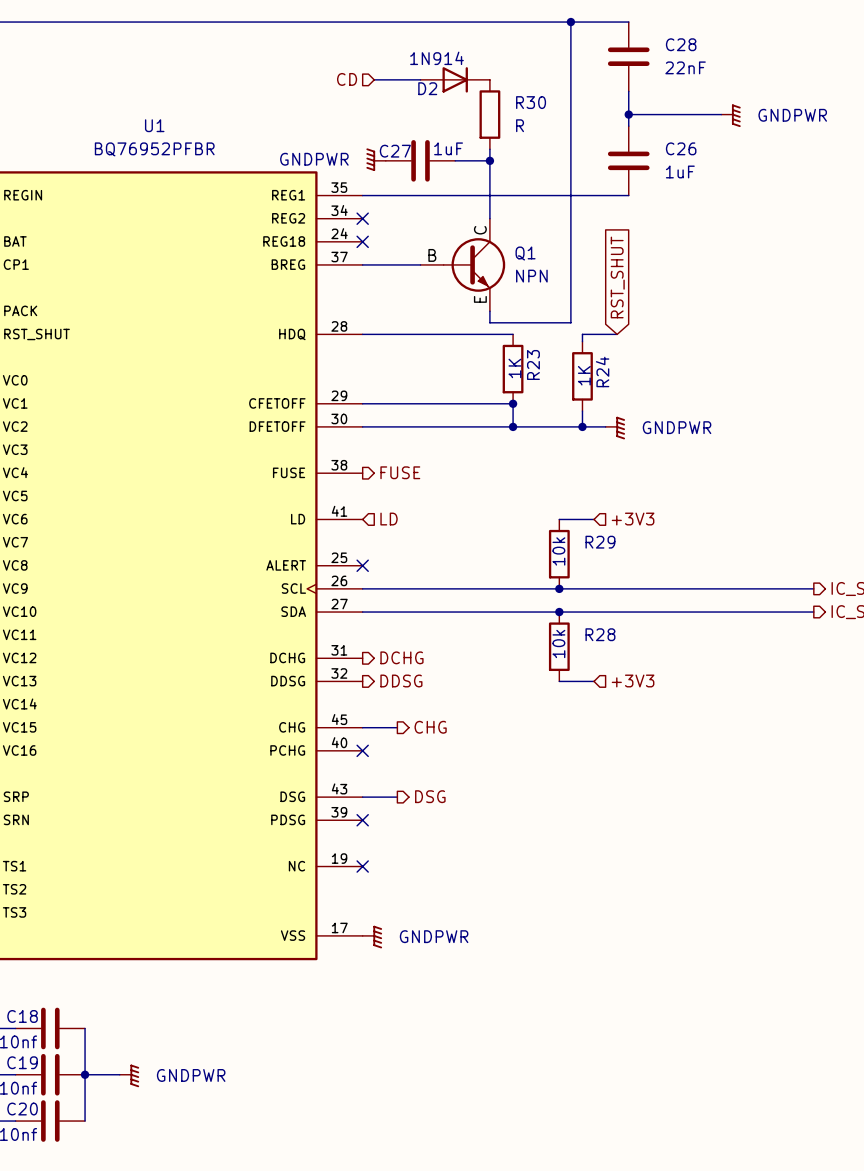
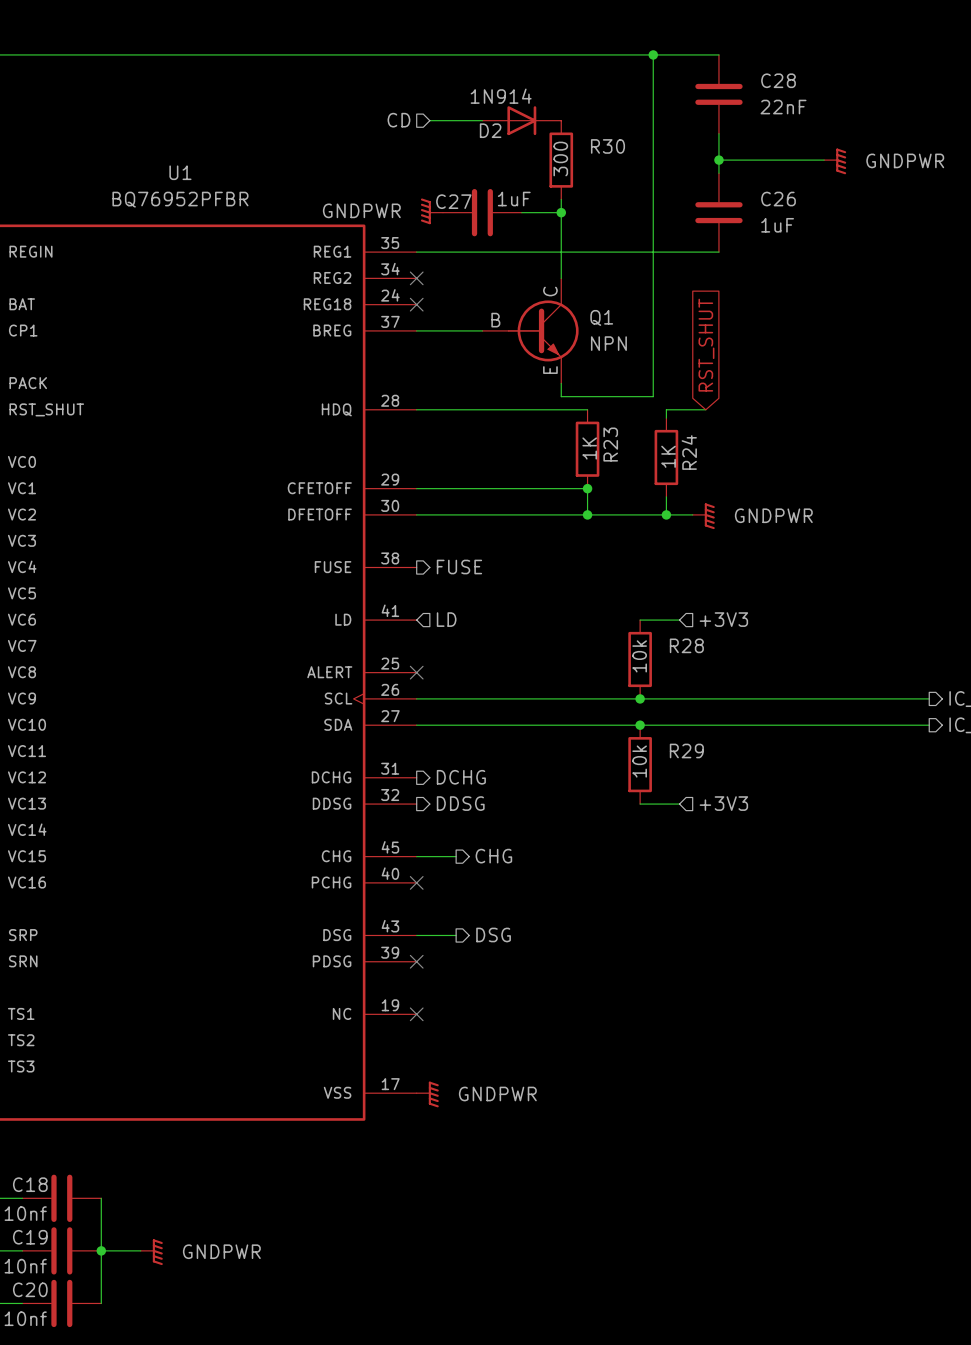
R30 value: R (520, 125) -> 300 (560, 158)
R29 name: R29 (600, 542) -> R28 (686, 645)
R28 name: R28 (600, 634) -> R29 (686, 750)

